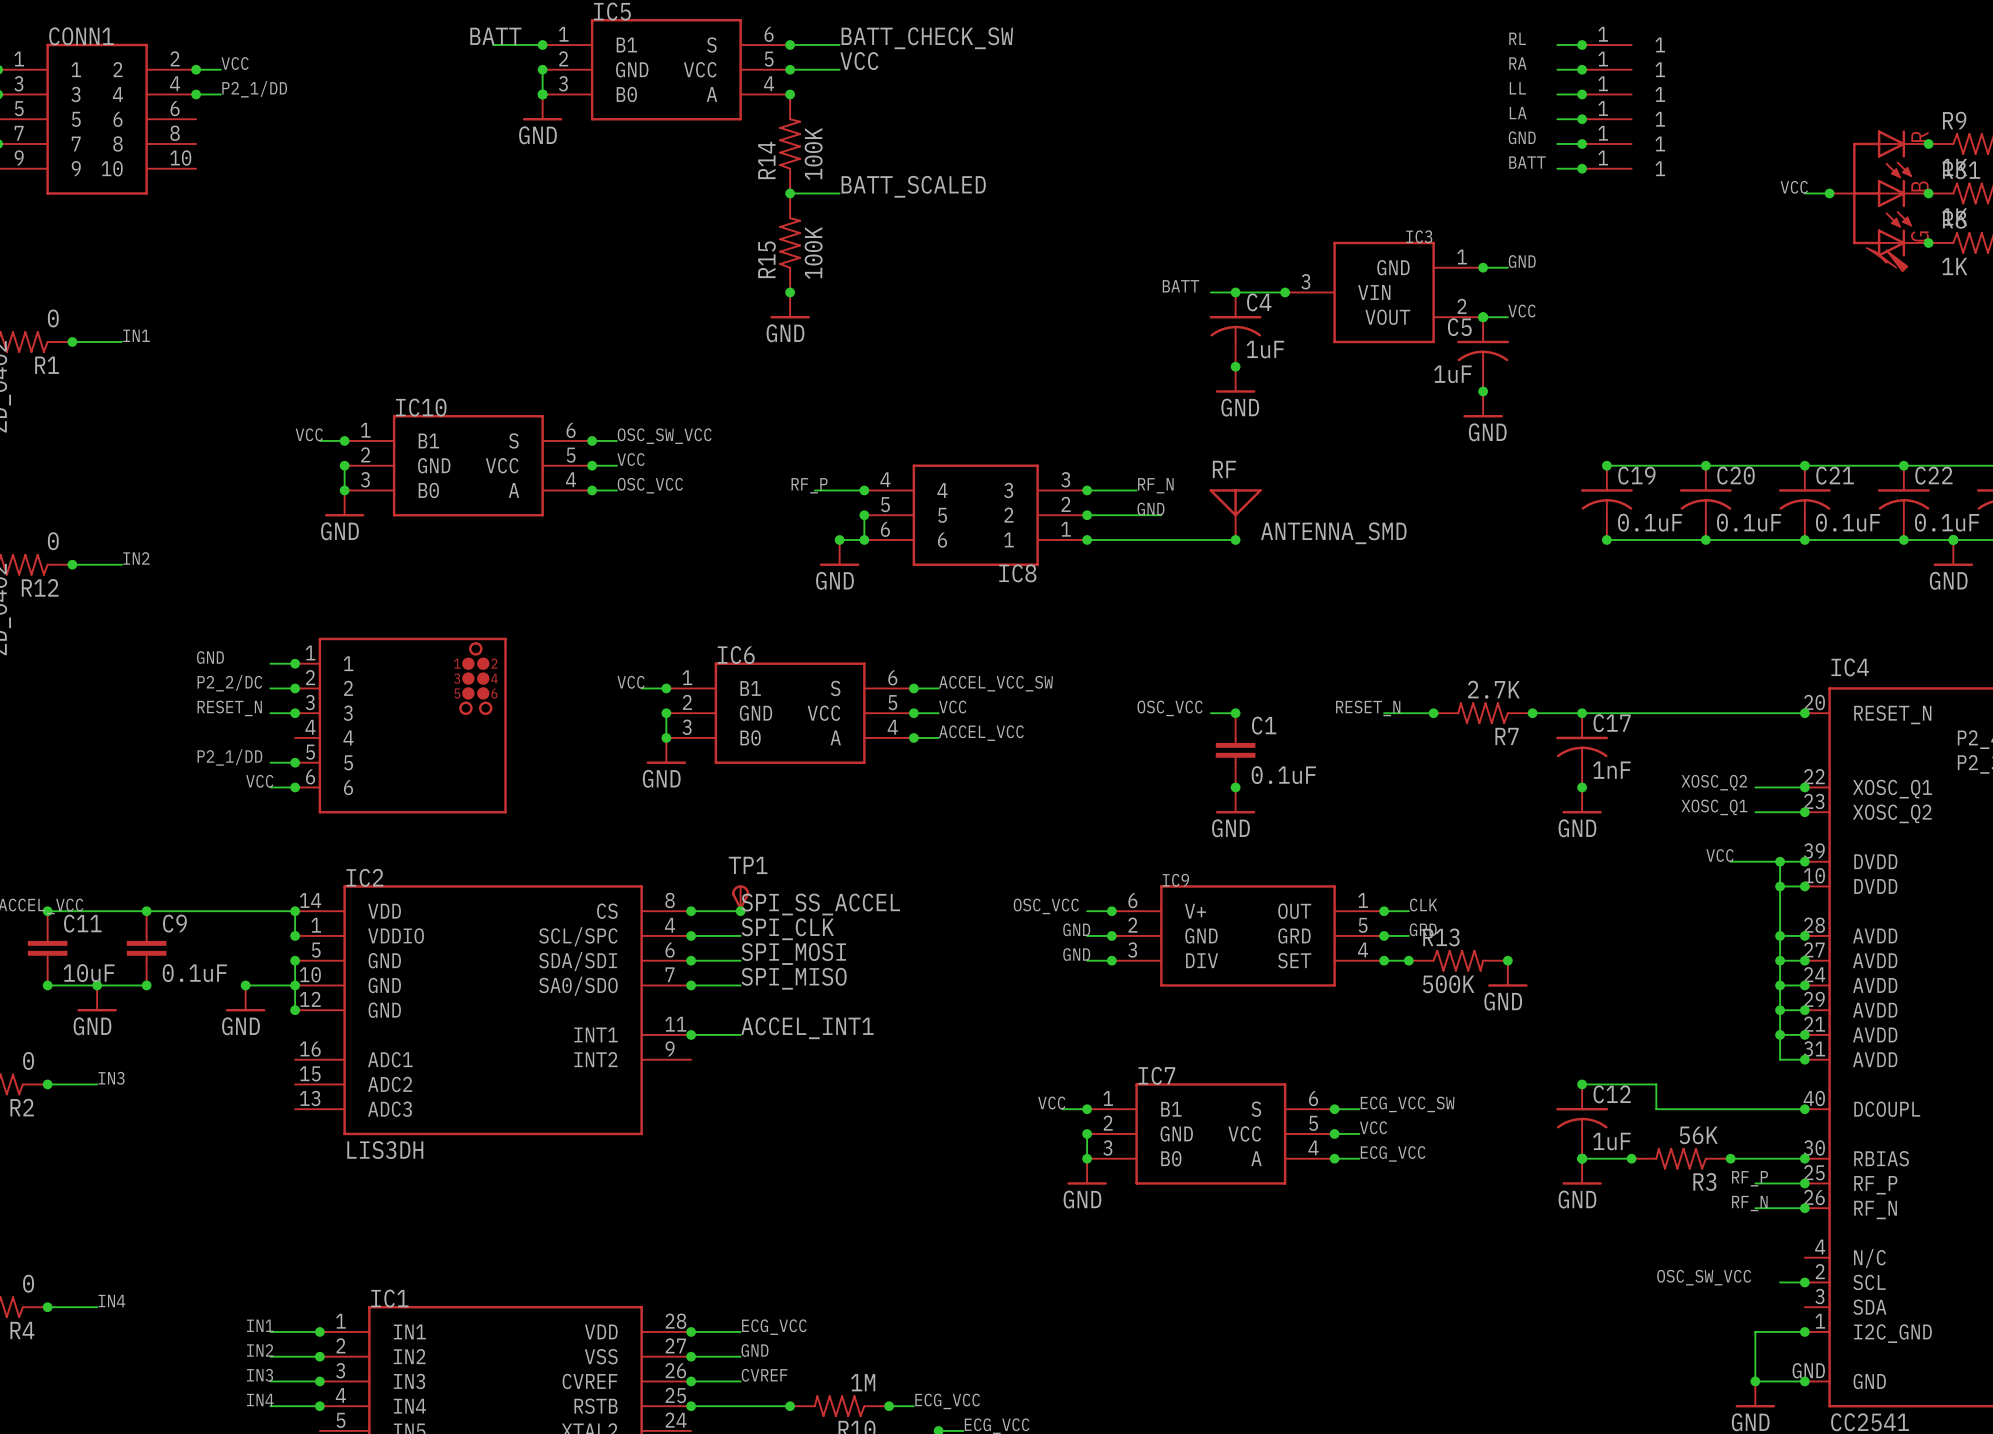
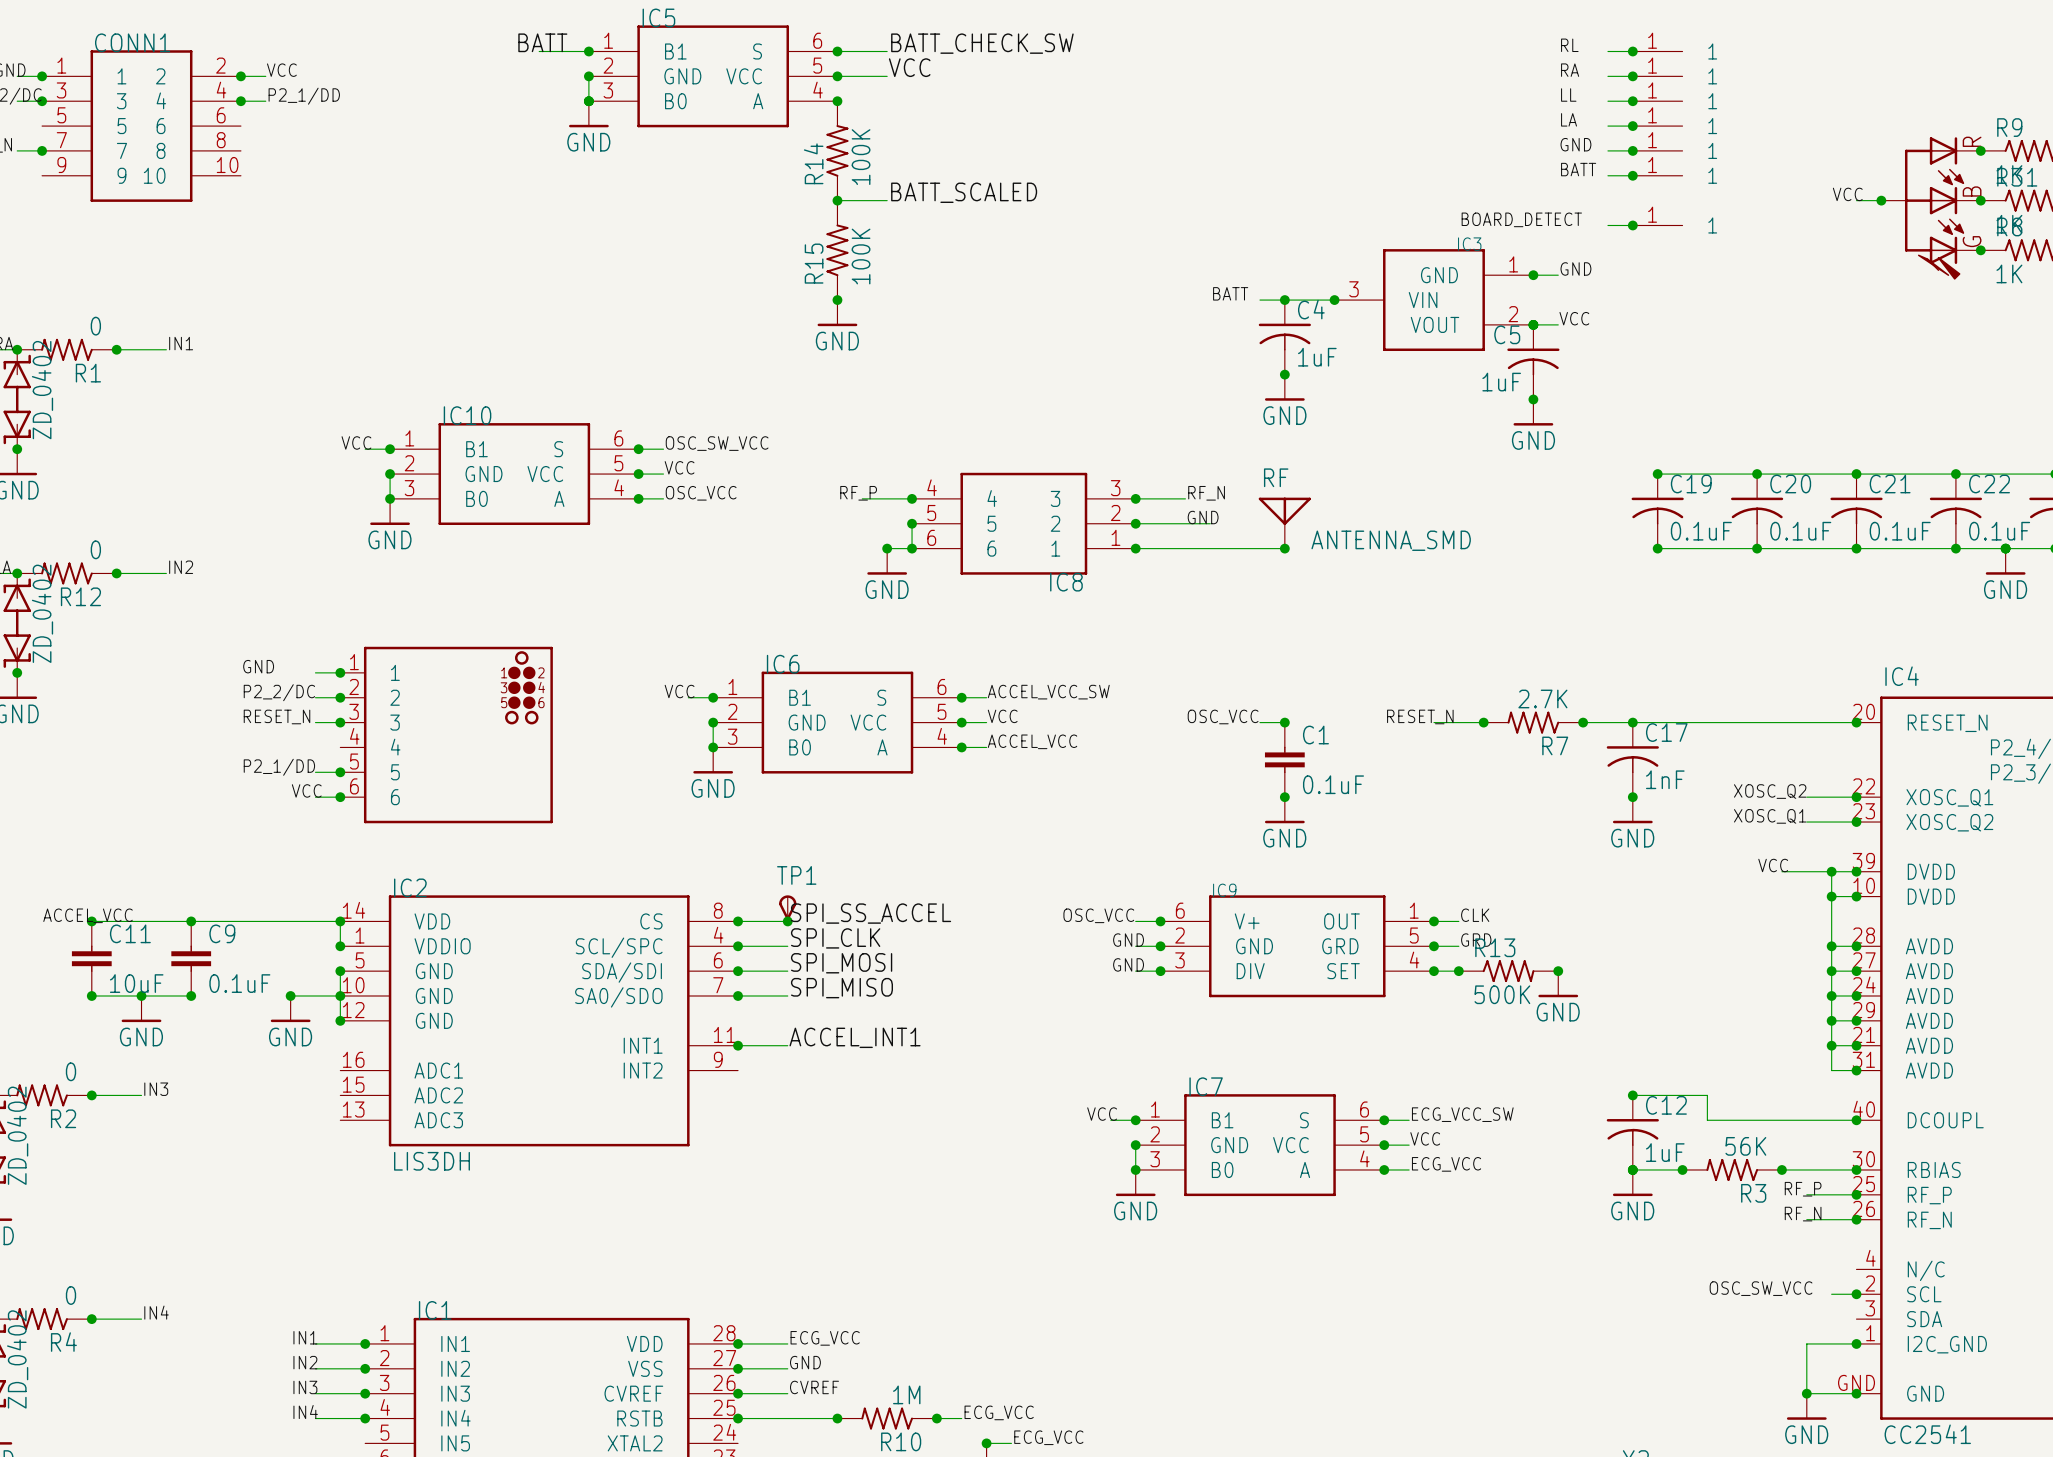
label: none -> BOARD_DETECT (1521, 219)
wire: none -> (1607, 225) (1632, 225)
junction: none -> (1632, 225)
part: none -> (1657, 225)

